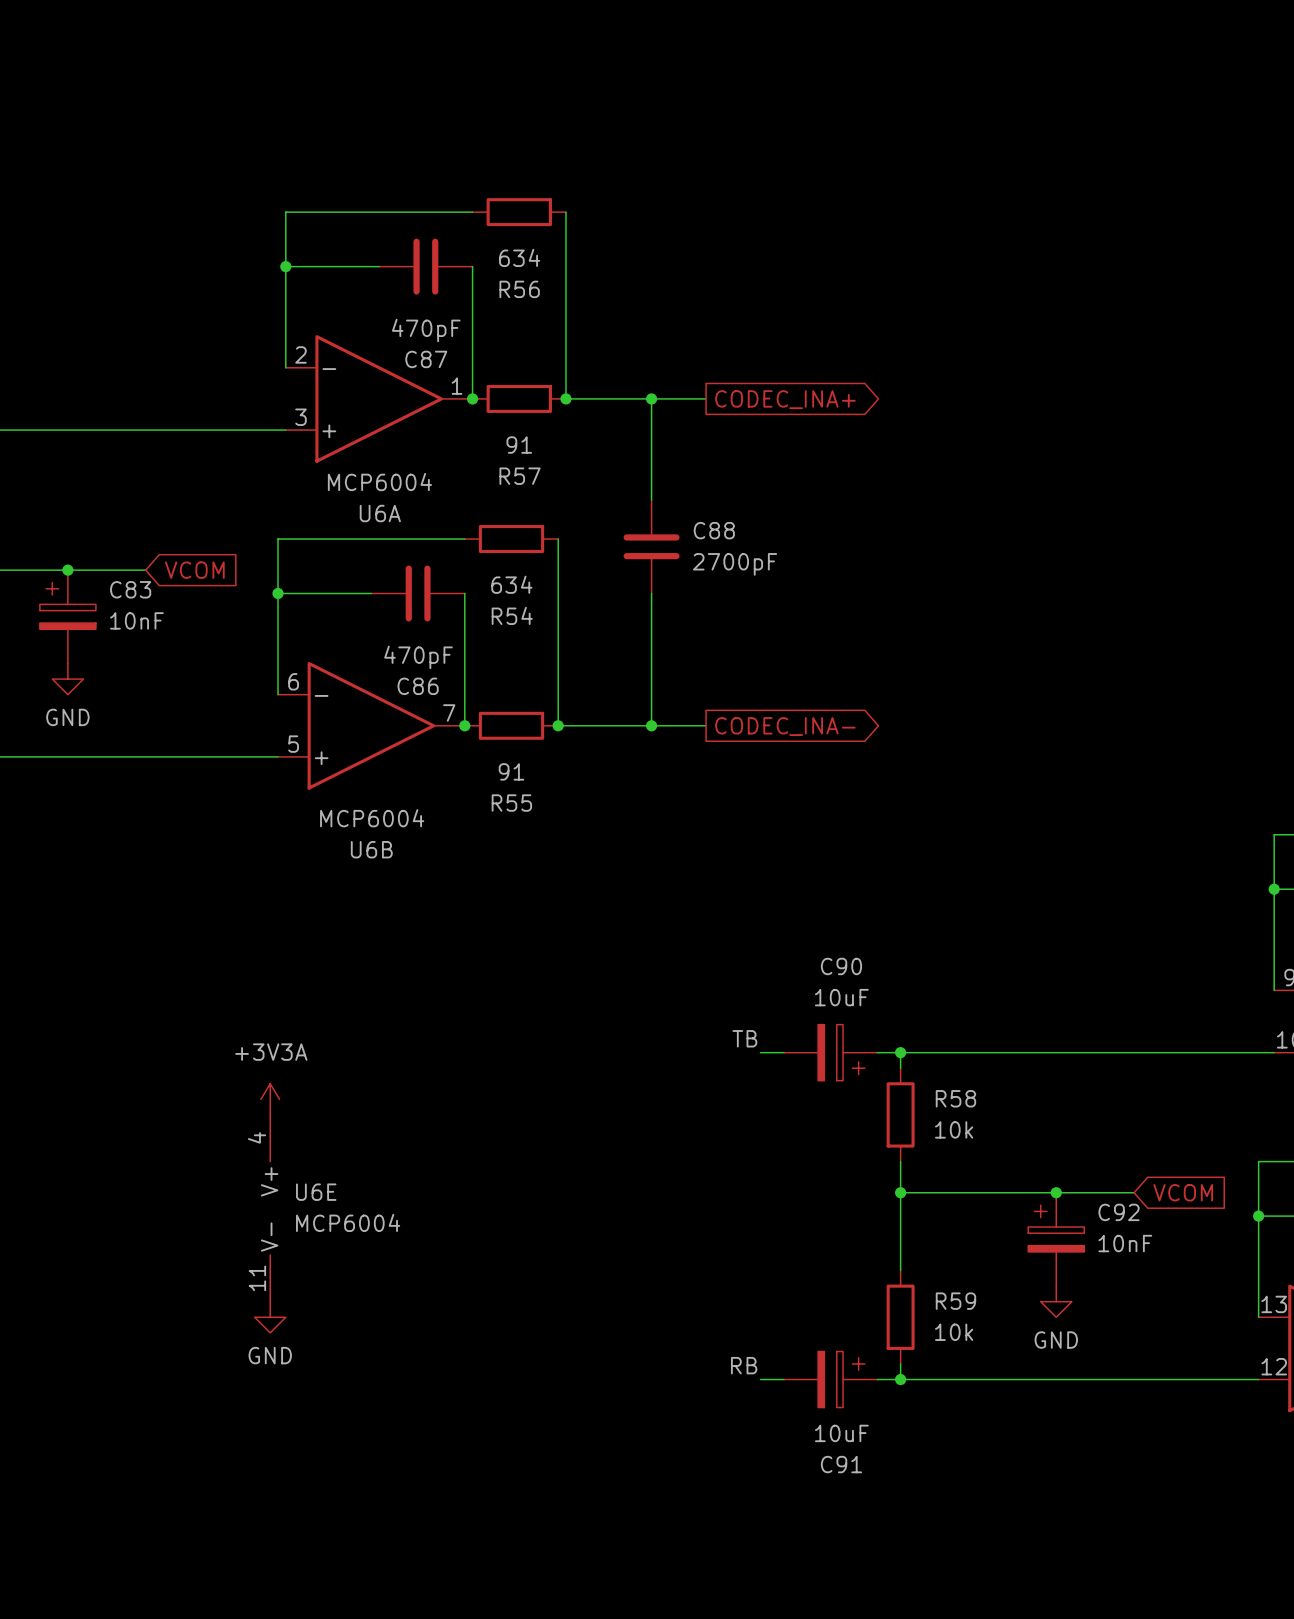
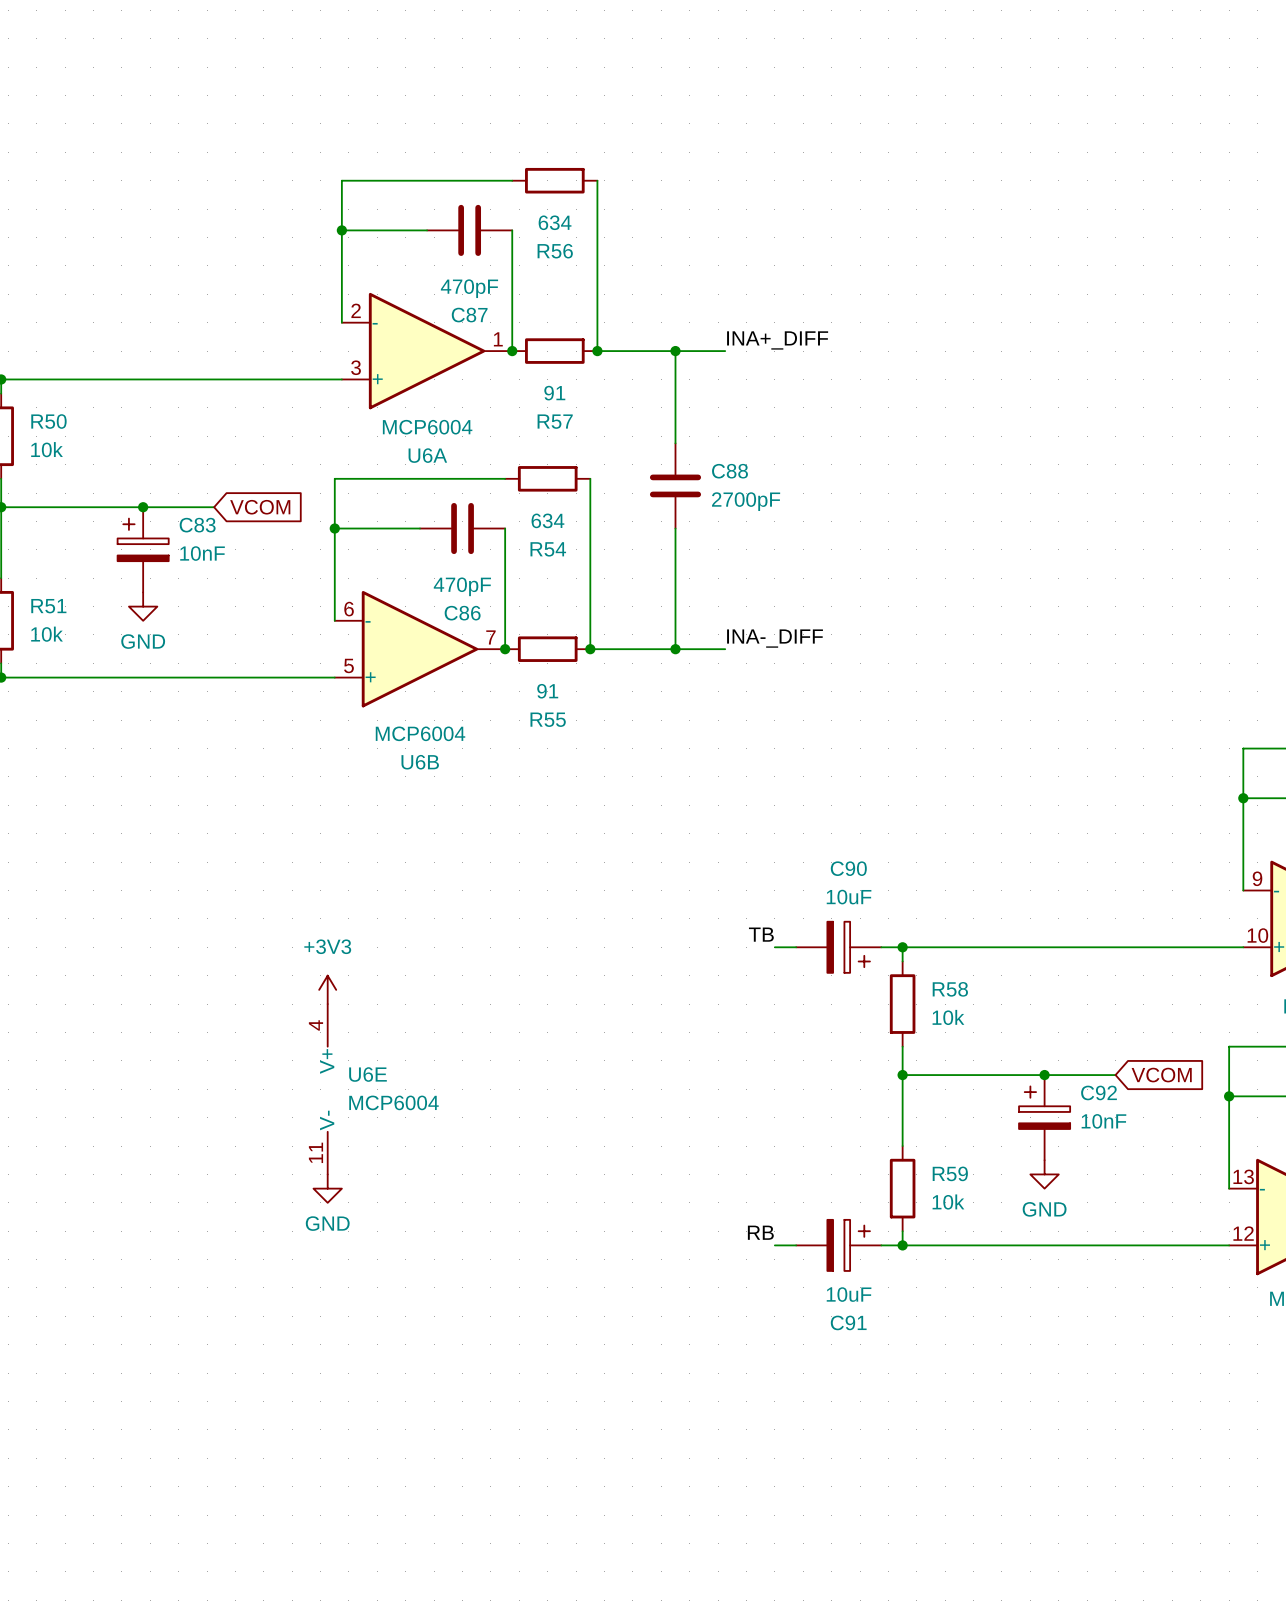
label: none -> INA+_DIFF (777, 340)
global label: CODEC_INA+ (785, 399) -> none
label: none -> INA-_DIFF (775, 638)
global label: CODEC_INA- (785, 726) -> none
power symbol: +3V3A (270, 1099) -> +3V3 (327, 989)

